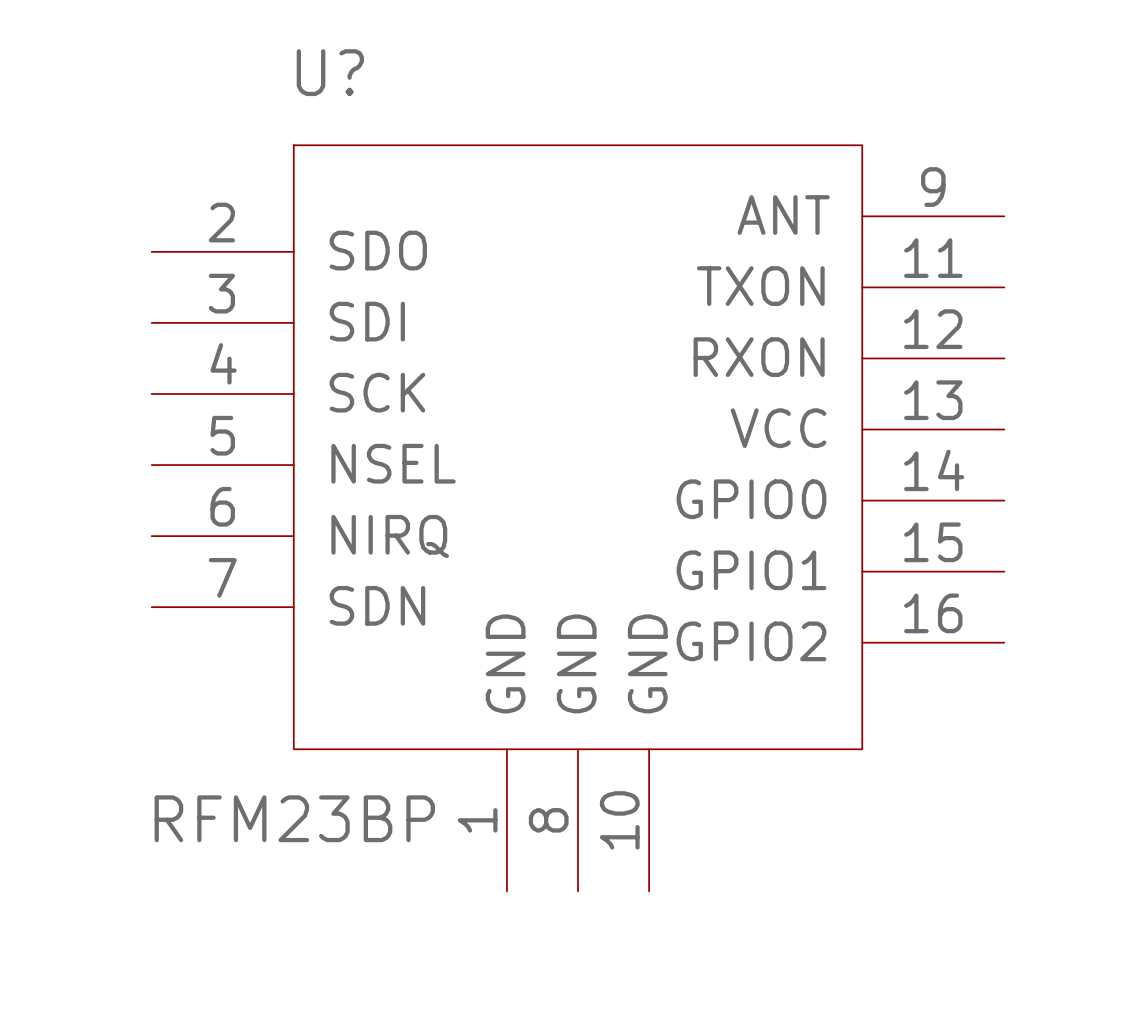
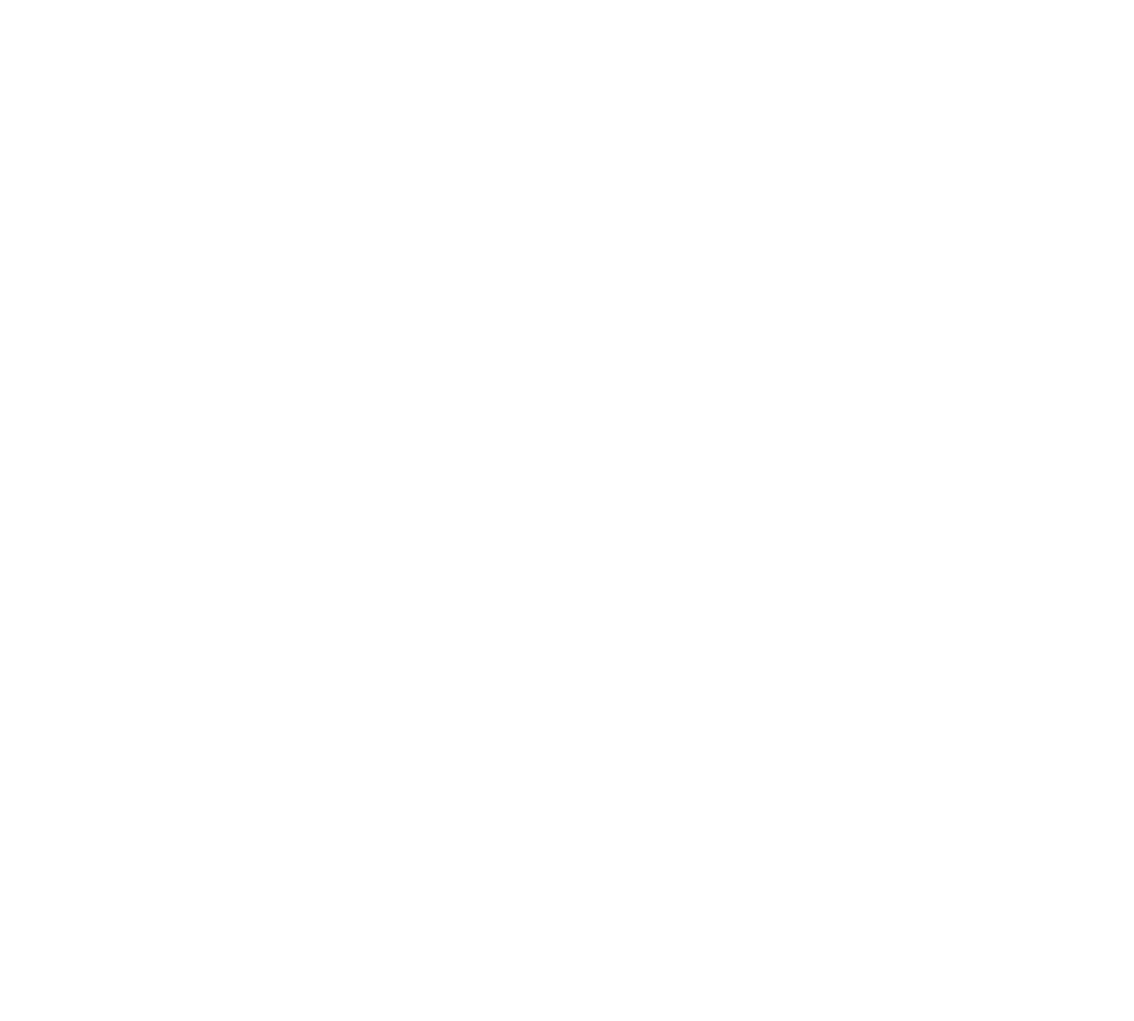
U?: RFM23BP (578, 518) -> none

